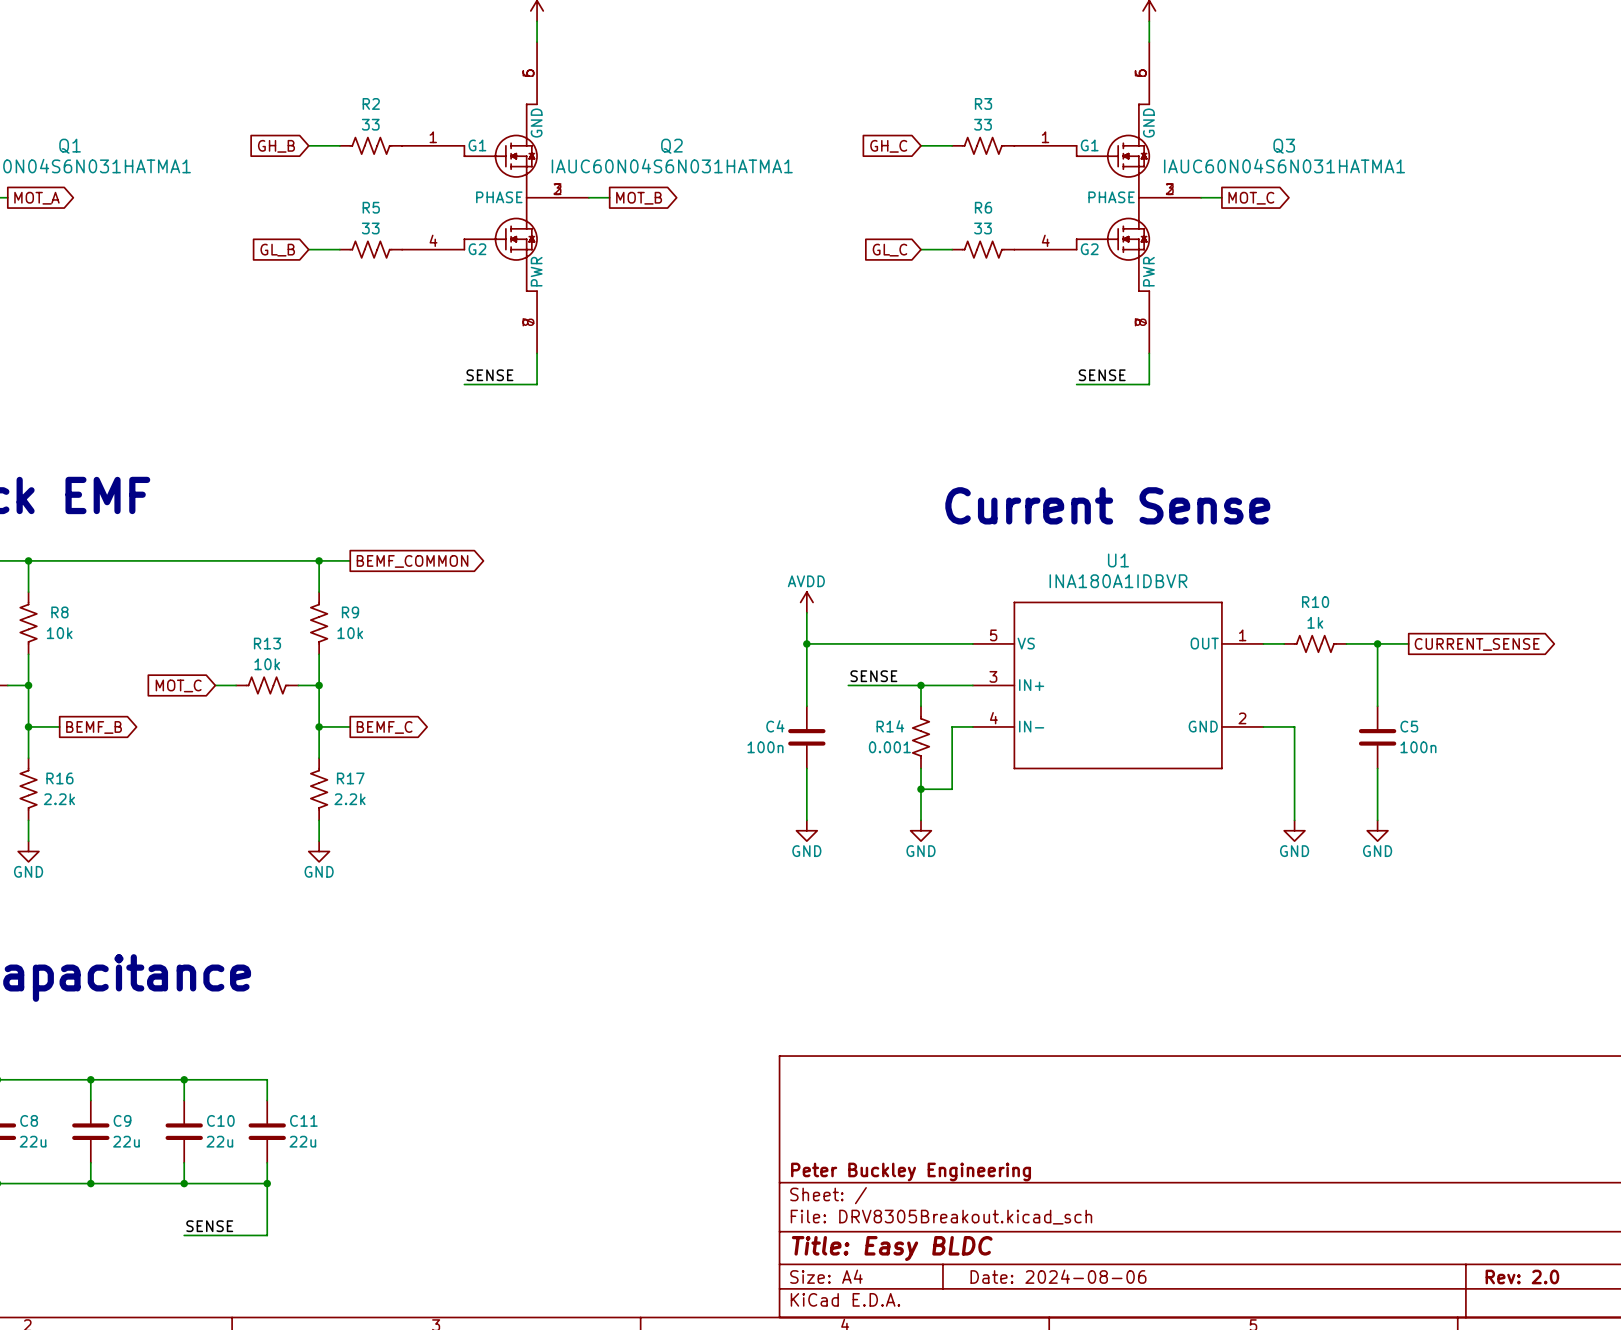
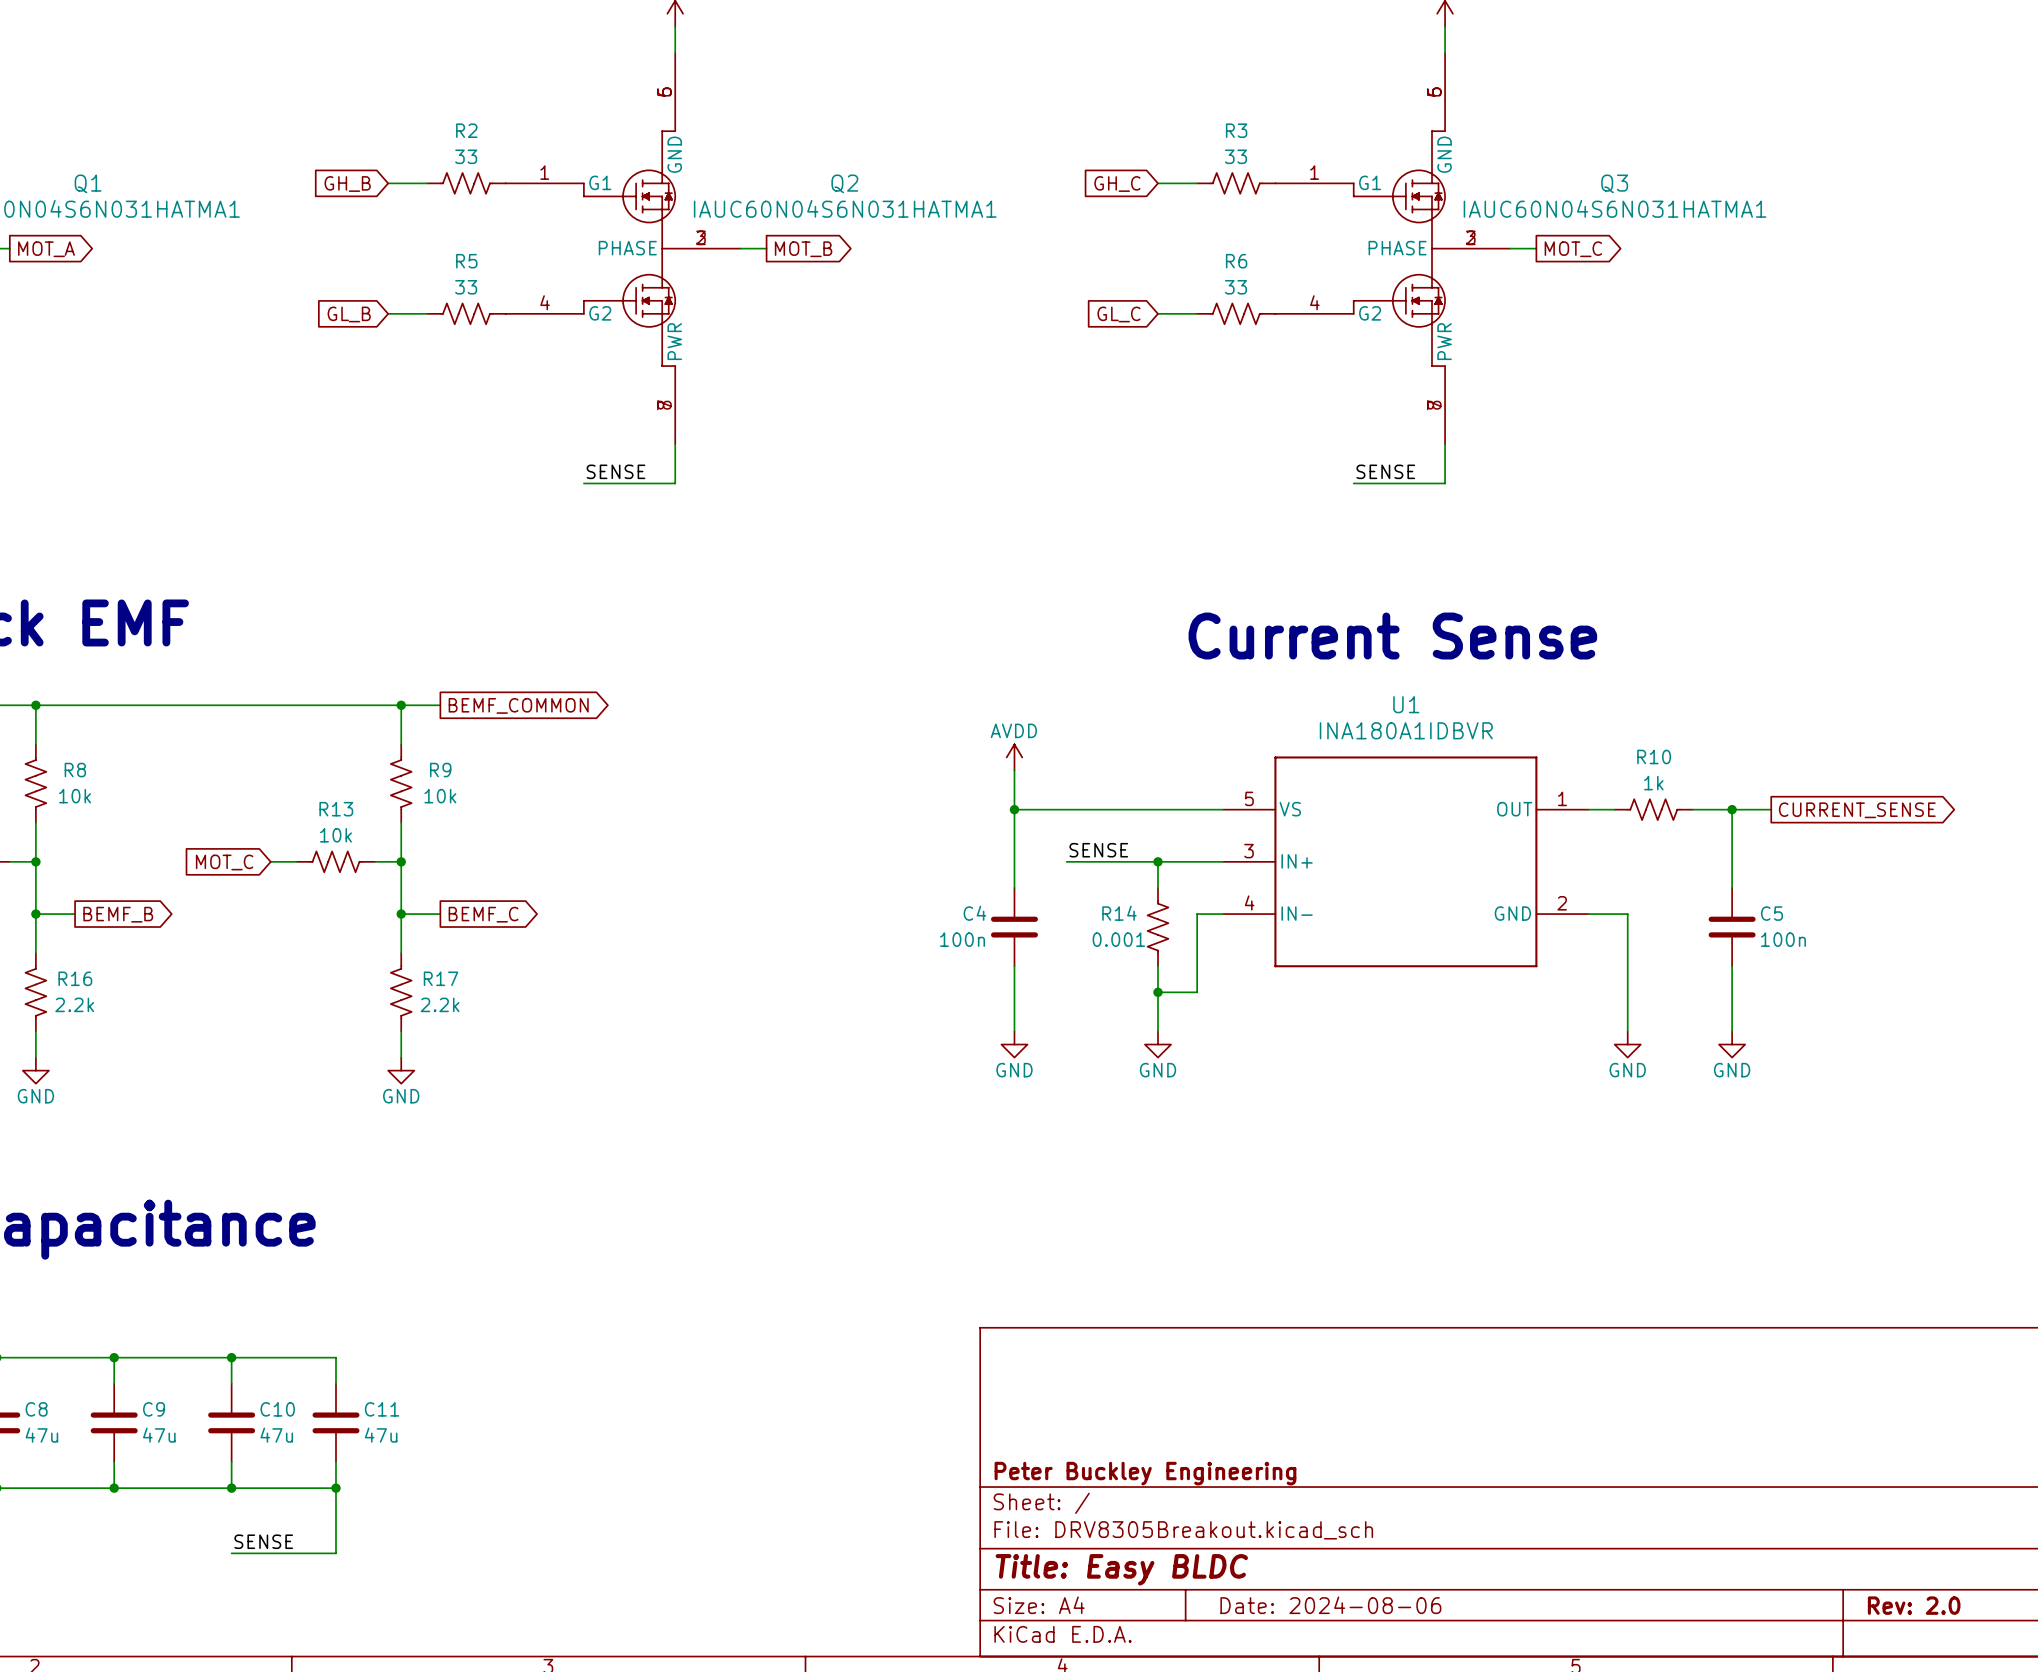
C8 value: 22u (33, 1141) -> 47u (41, 1435)
C9 value: 22u (126, 1141) -> 47u (159, 1435)
C10 value: 22u (219, 1141) -> 47u (276, 1435)
C11 value: 22u (302, 1141) -> 47u (381, 1435)

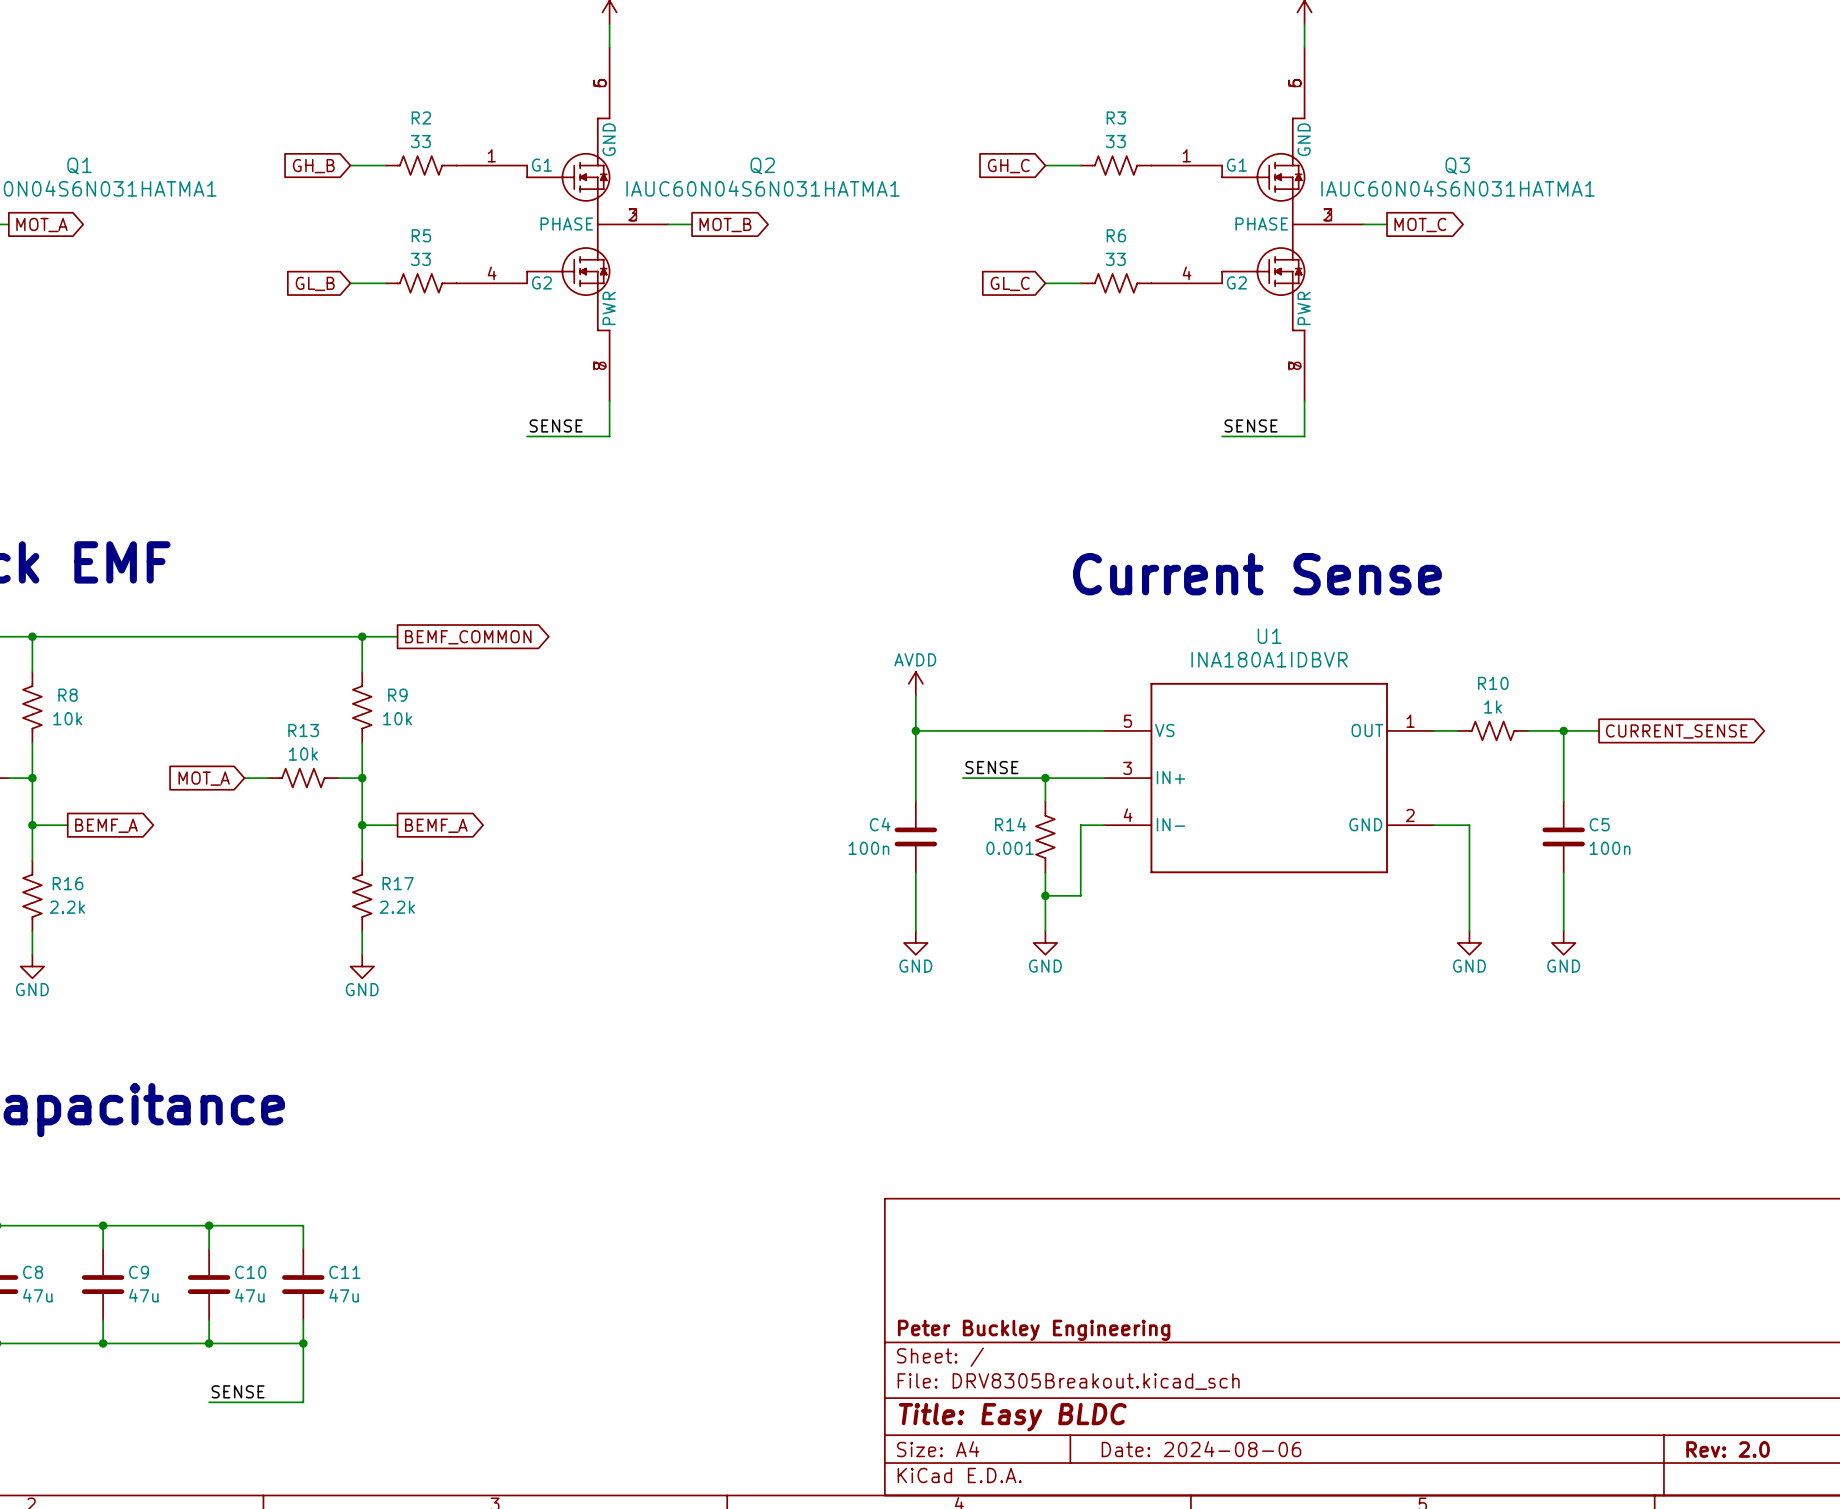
global label: MOT_C (224, 862) -> MOT_A (204, 778)
global label: BEMF_B (118, 914) -> BEMF_A (106, 825)
global label: BEMF_C (483, 914) -> BEMF_A (436, 825)

